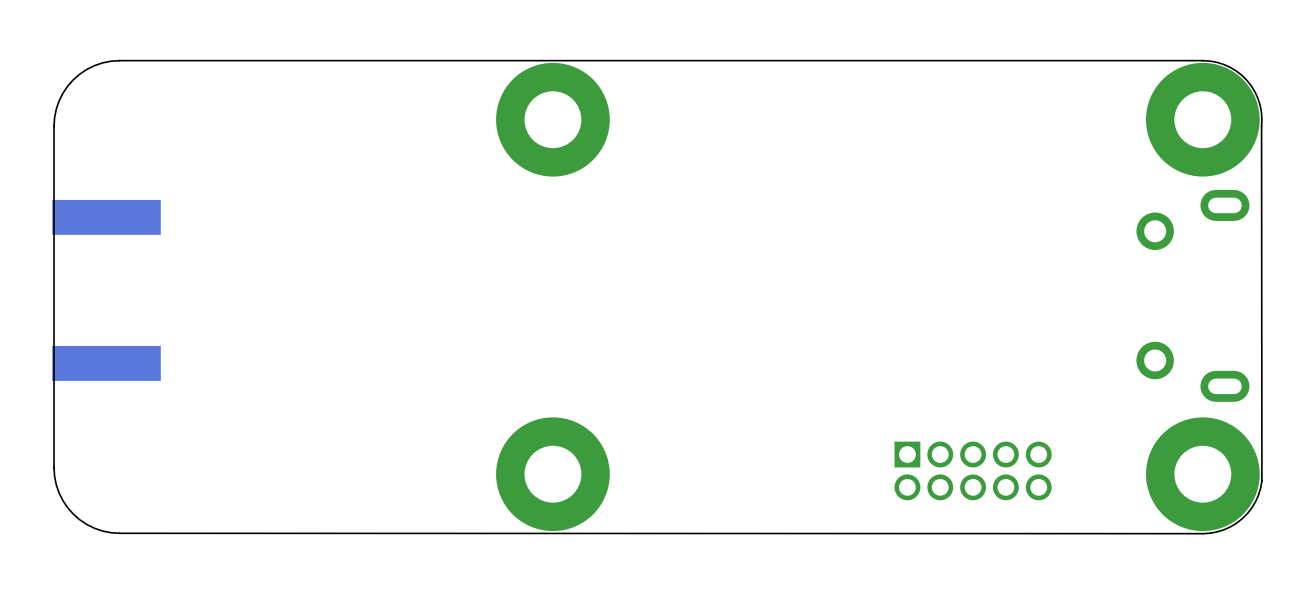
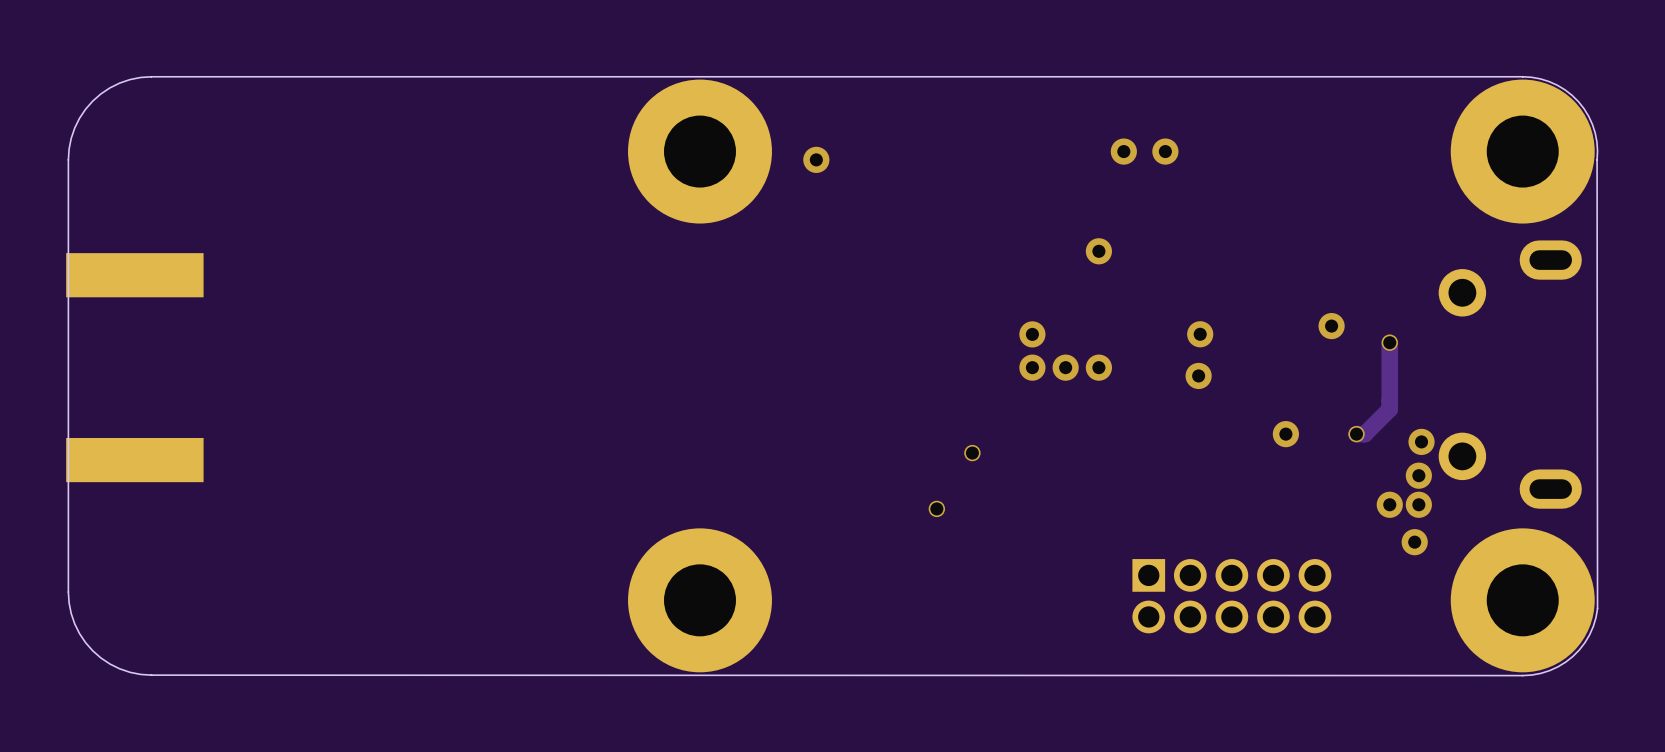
via: none -> (1123, 151)
via: none -> (1165, 151)
via: none -> (816, 159)
via: none -> (1098, 251)
via: none -> (1331, 326)
via: none -> (1032, 334)
via: none -> (1200, 334)
track: none -> (1389, 342) (1389, 409) (1364, 434) (1356, 434)
via: none -> (1389, 342)
via: none -> (1032, 367)
via: none -> (1065, 367)
via: none -> (1098, 367)
via: none -> (1198, 375)
via: none -> (1285, 434)
via: none -> (1356, 434)
via: none -> (1421, 441)
via: none -> (972, 453)
via: none -> (1418, 475)
via: none -> (1389, 504)
via: none -> (1418, 504)
via: none -> (936, 508)
via: none -> (1414, 542)

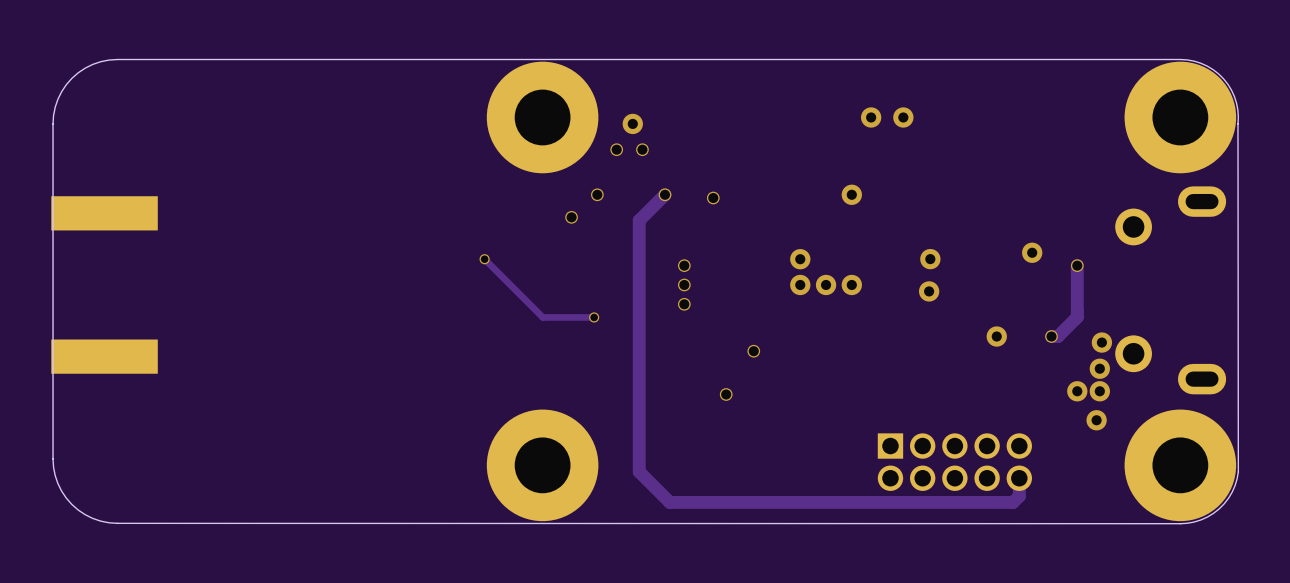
via: none -> (616, 149)
via: none -> (642, 149)
via: none -> (597, 194)
track: none -> (665, 194) (639, 220) (639, 471) (669, 502) (1013, 502) (1019, 496) (1019, 478)
via: none -> (665, 194)
via: none -> (713, 198)
via: none -> (571, 217)
track: none -> (484, 259) (542, 317) (594, 317)
via: none -> (484, 259)
via: none -> (684, 265)
via: none -> (684, 284)
via: none -> (684, 304)
via: none -> (594, 317)

